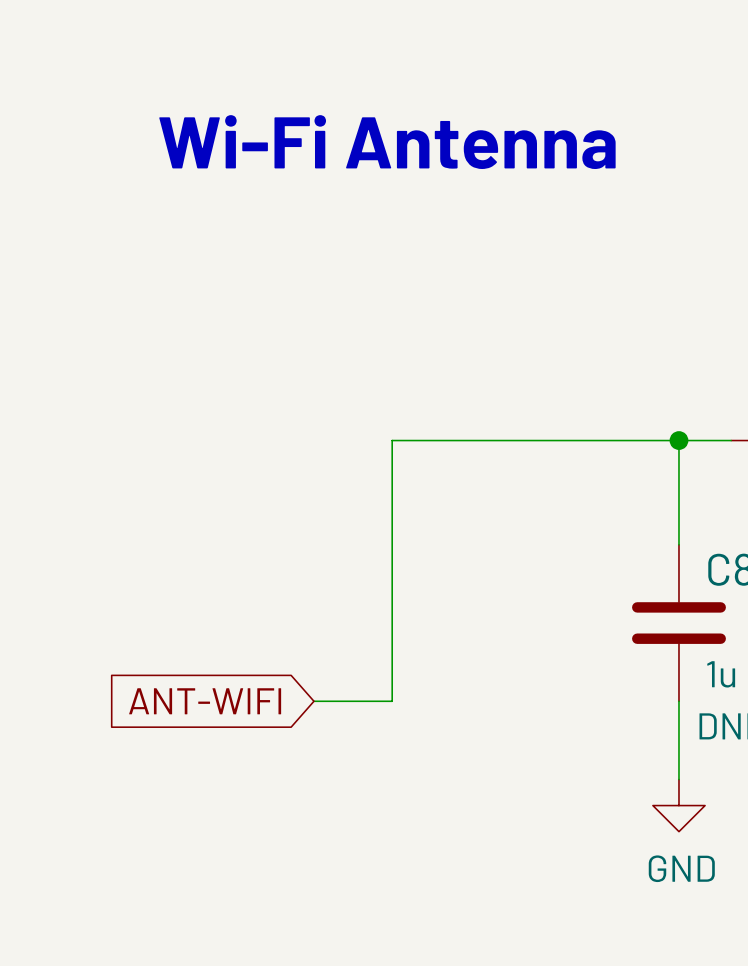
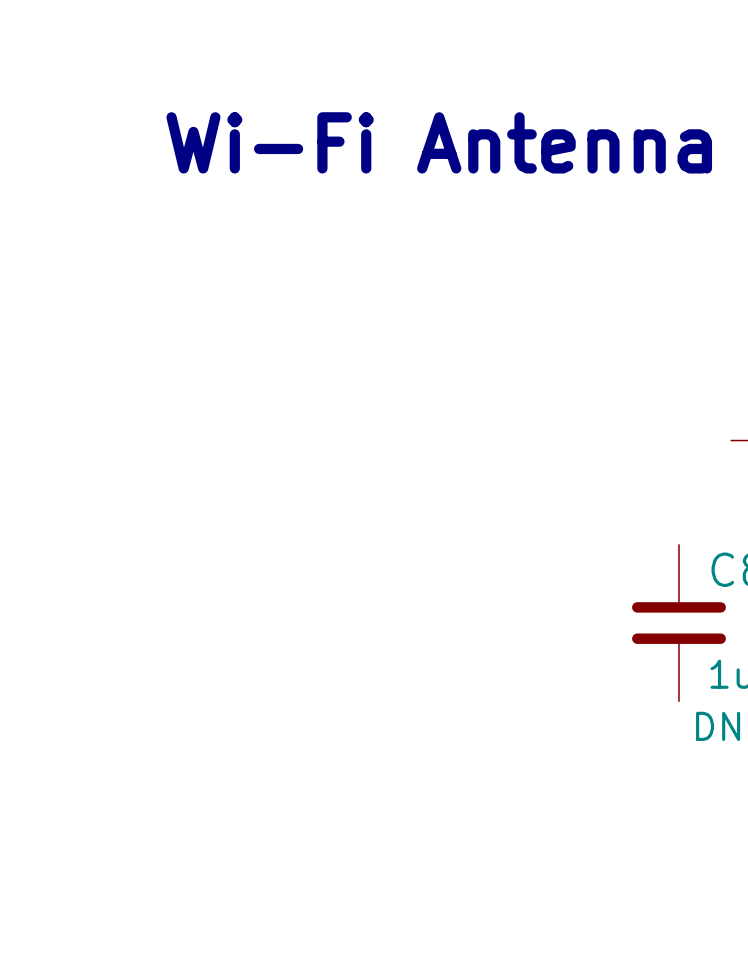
wire: (678, 440) (678, 544) -> none
junction: (678, 440) -> none
wire: (731, 440) (392, 440) (392, 701) (313, 701) -> none
global label: ANT-WIFI (205, 701) -> none
wire: (678, 701) (678, 779) -> none
power symbol: GND (678, 805) -> none

